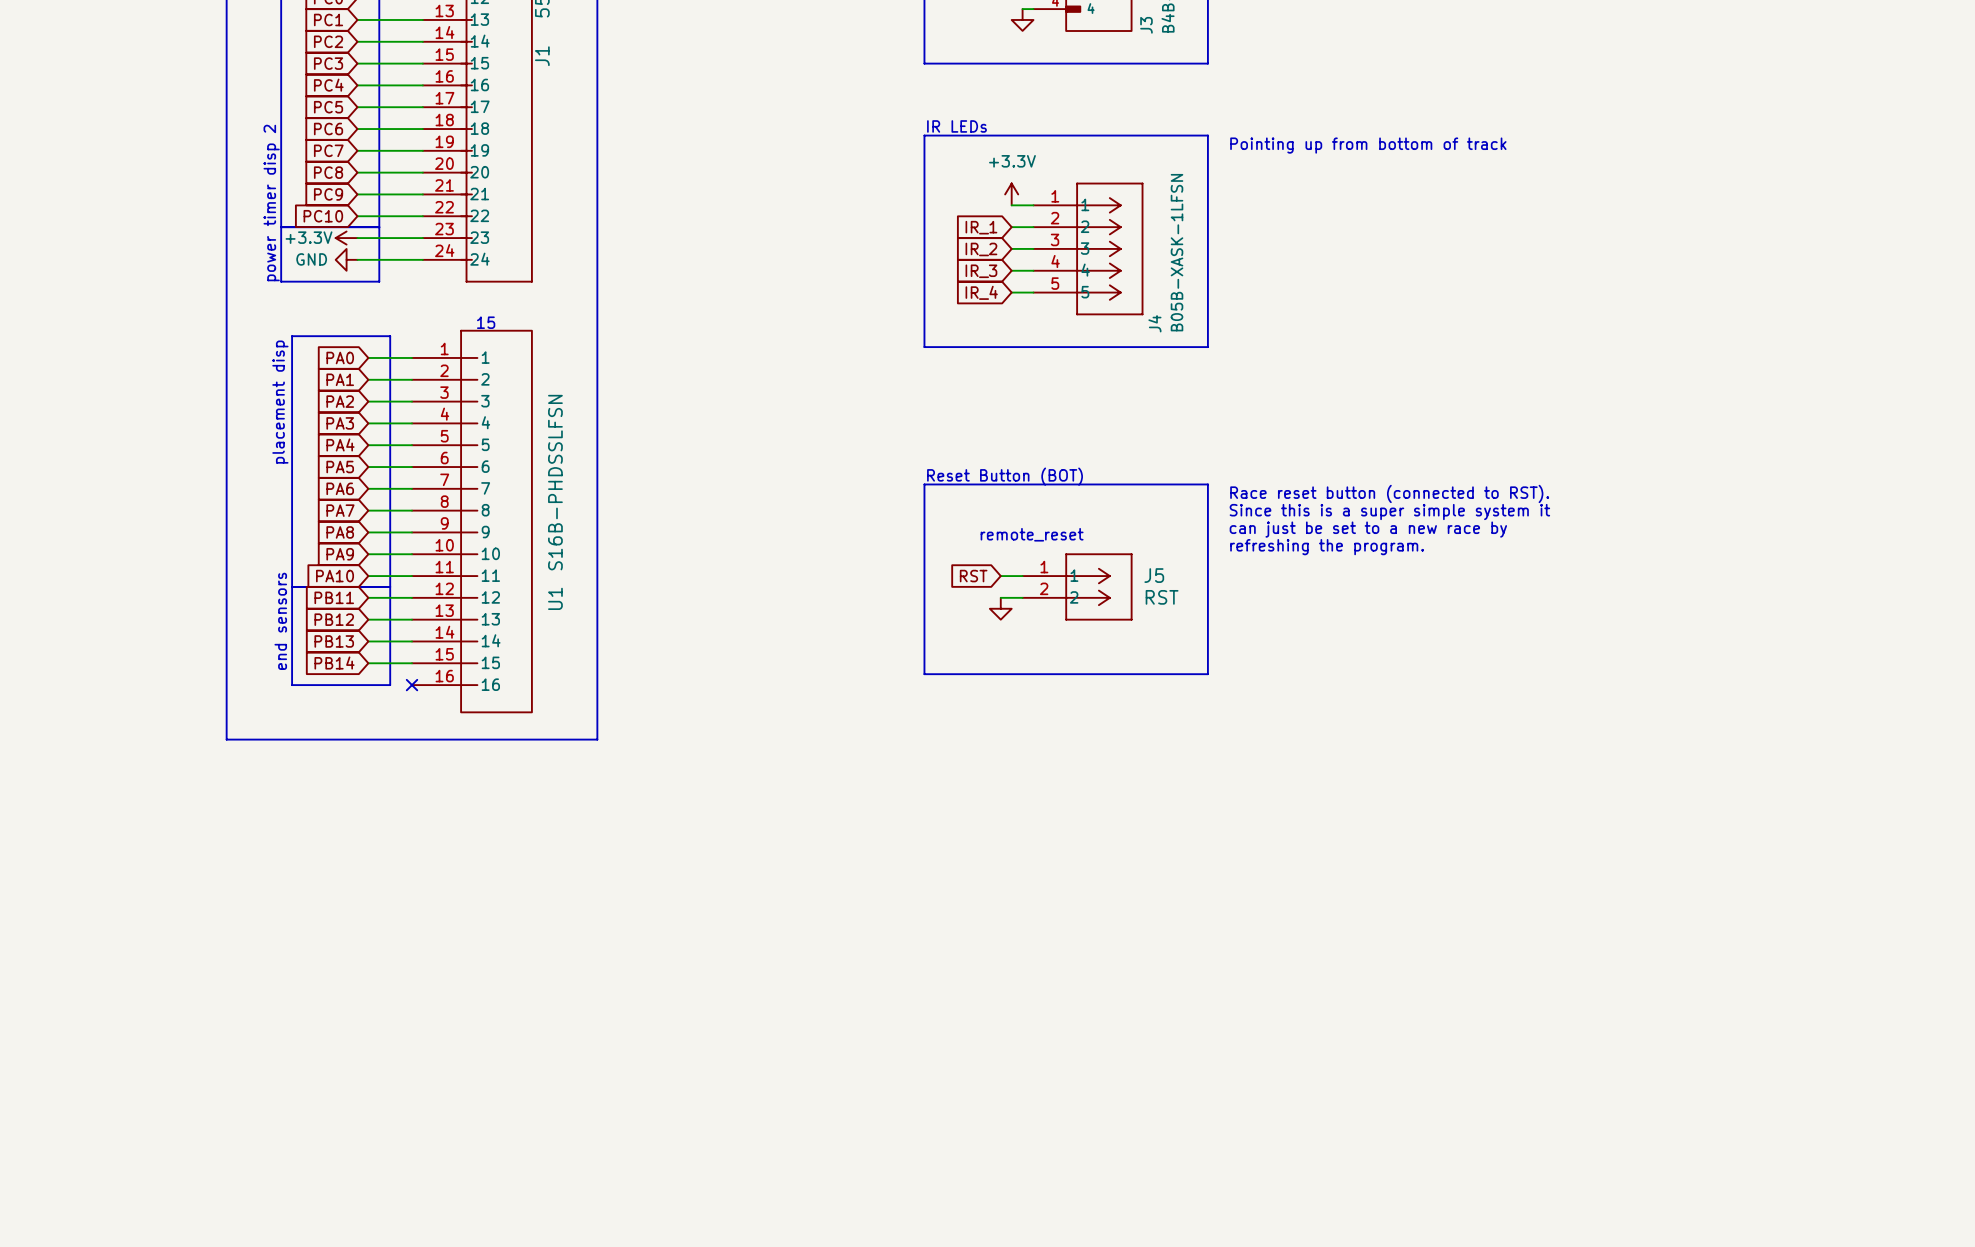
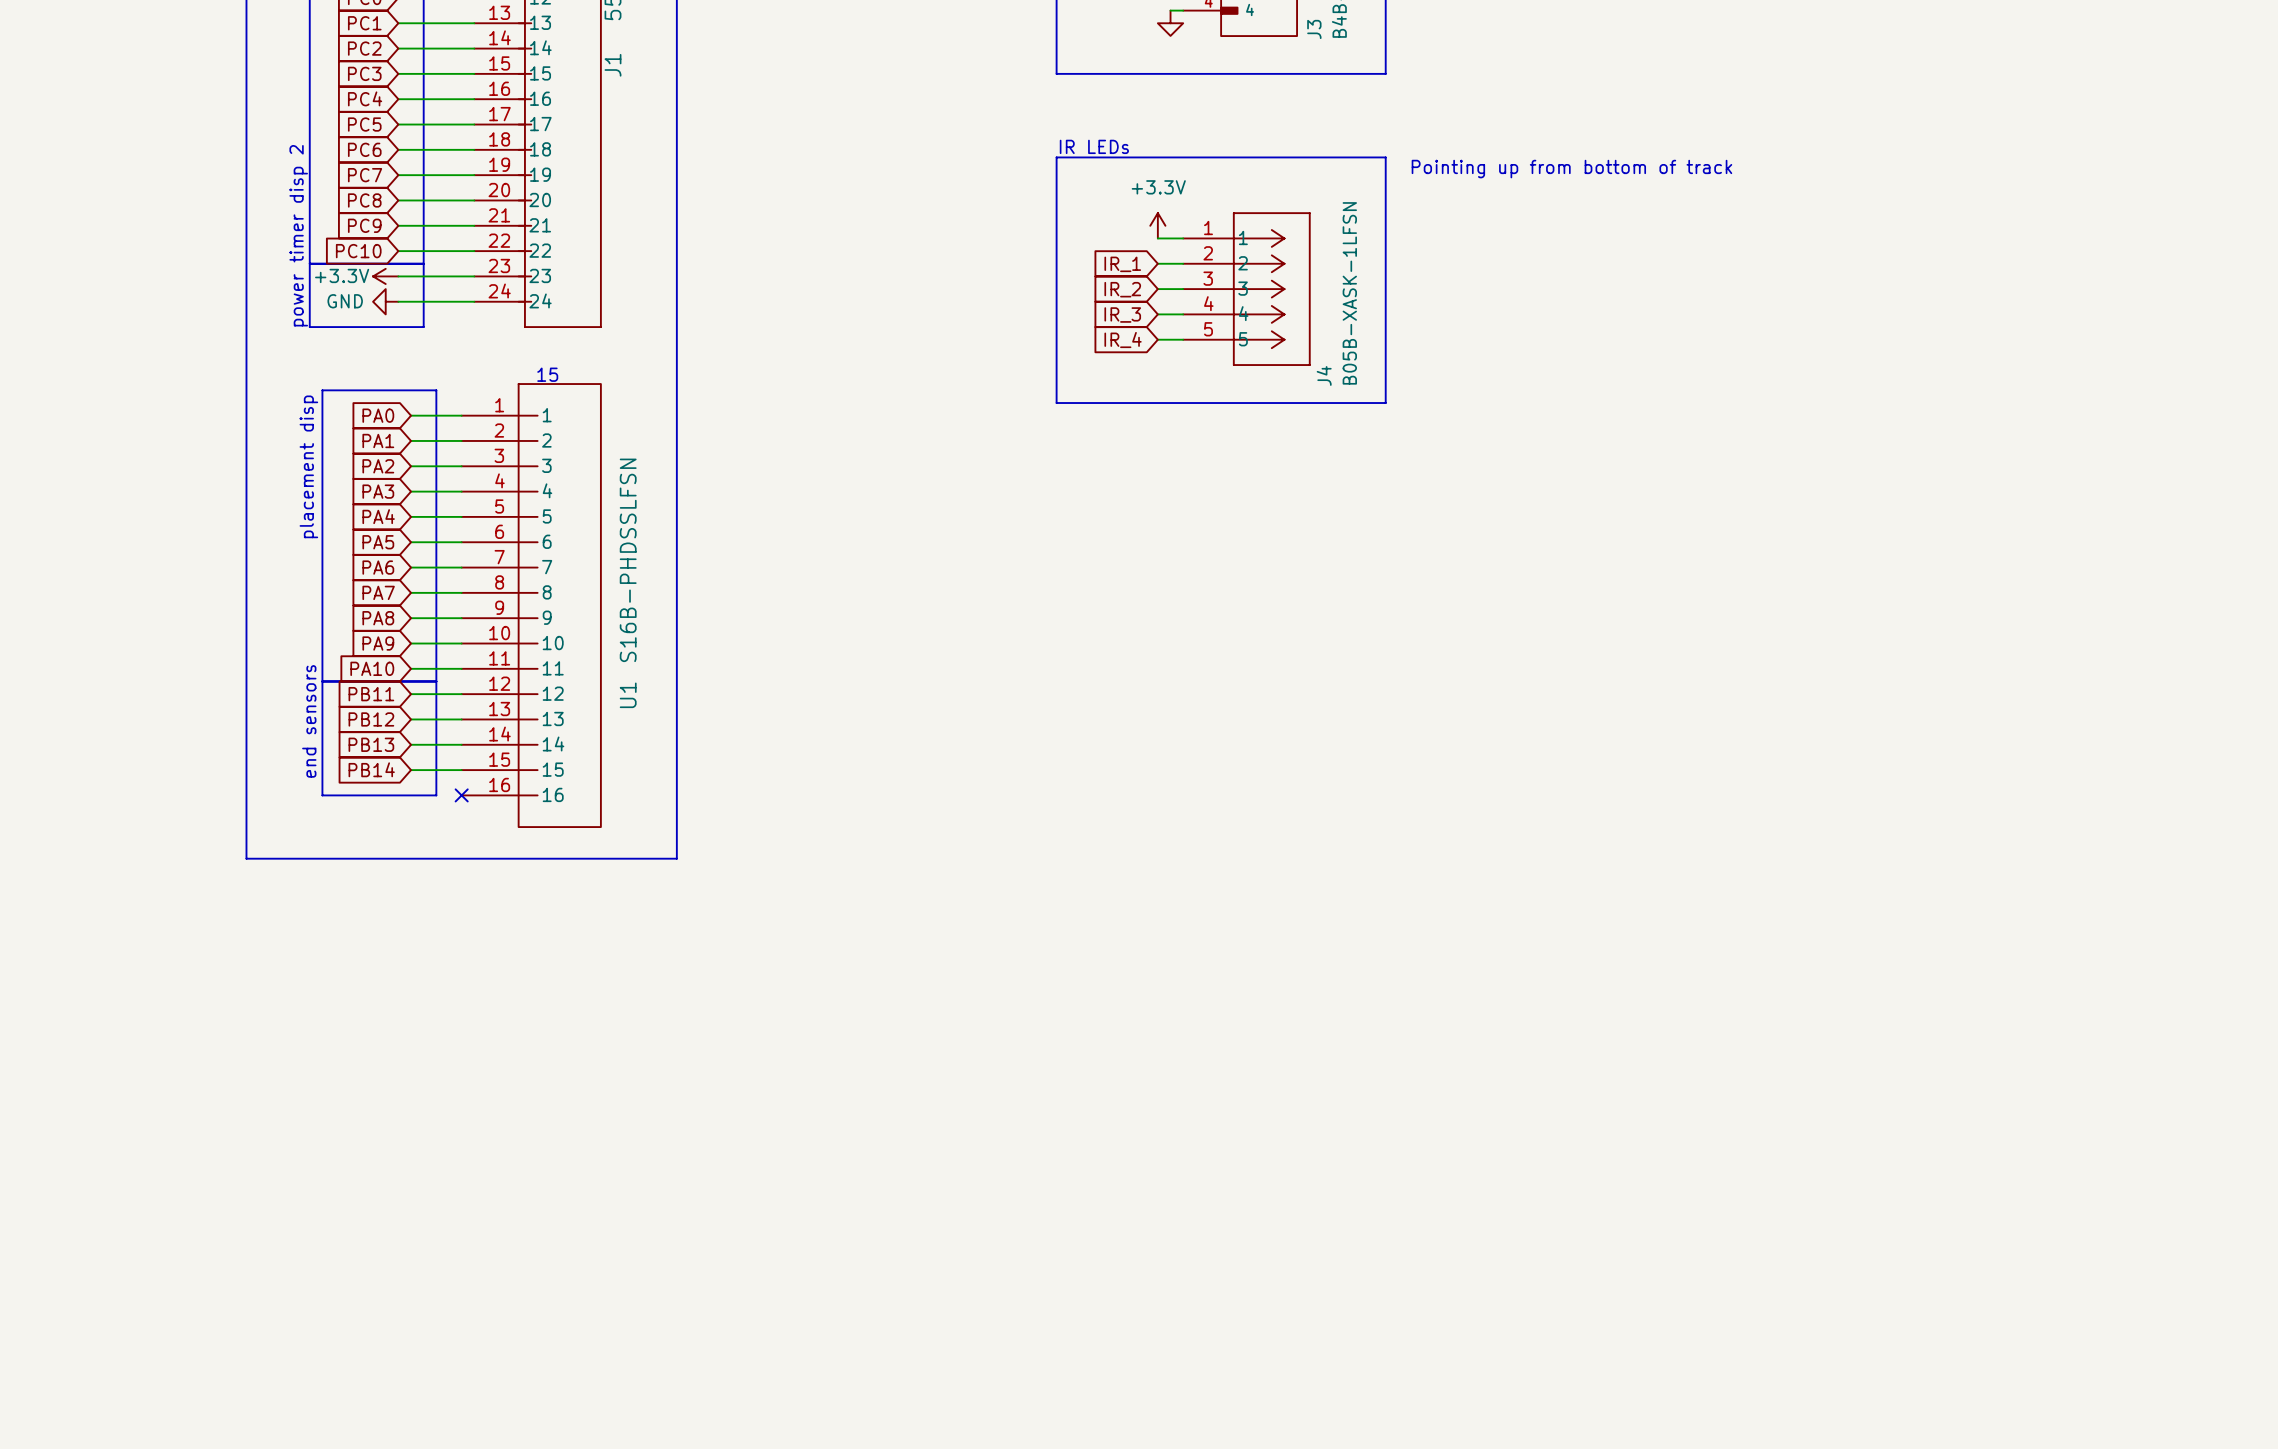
text: Reset Button (BOT) (1005, 476) -> none
line: (924, 484) (1207, 484) (1207, 674) (924, 674) (924, 484) -> none
text: Race reset button (connected to RST). (1389, 493) -> none
text: Since this is a super simple system it (1389, 512) -> none
text: can just be set to a new race by (1368, 529) -> none
text: remote_reset (1032, 534) -> none
text: refreshing the program. (1327, 547) -> none
global label: RST (973, 576) -> none
wire: (1000, 576) (1022, 576) -> none
J5: RST (1077, 586) -> none
wire: (1000, 597) (1022, 597) -> none
power symbol: (1000, 608) -> none

